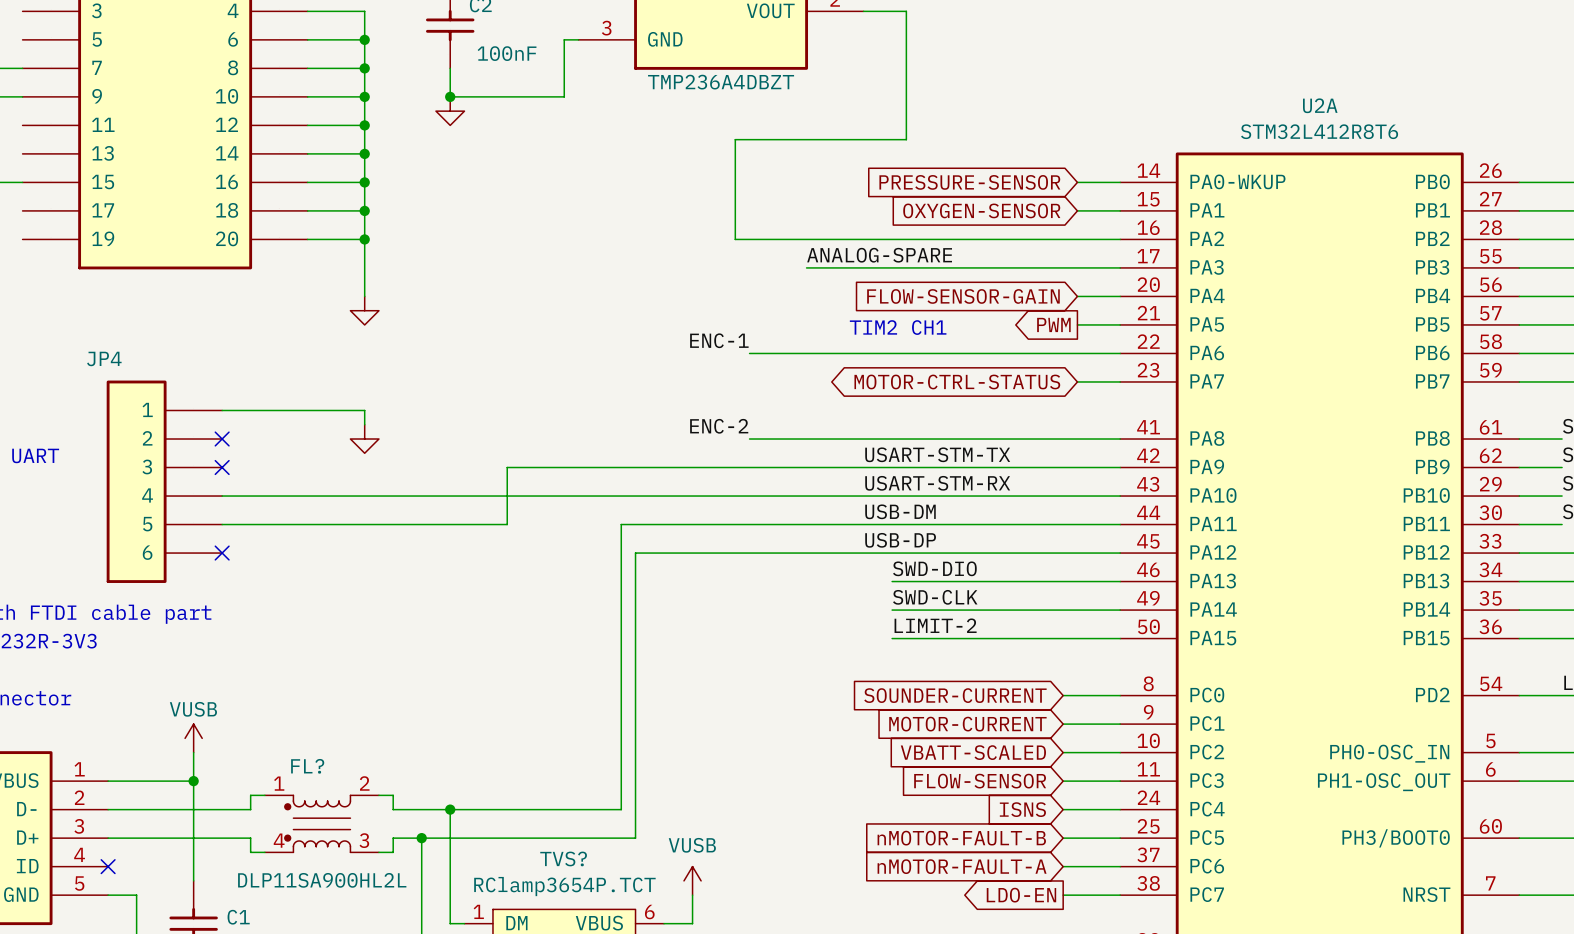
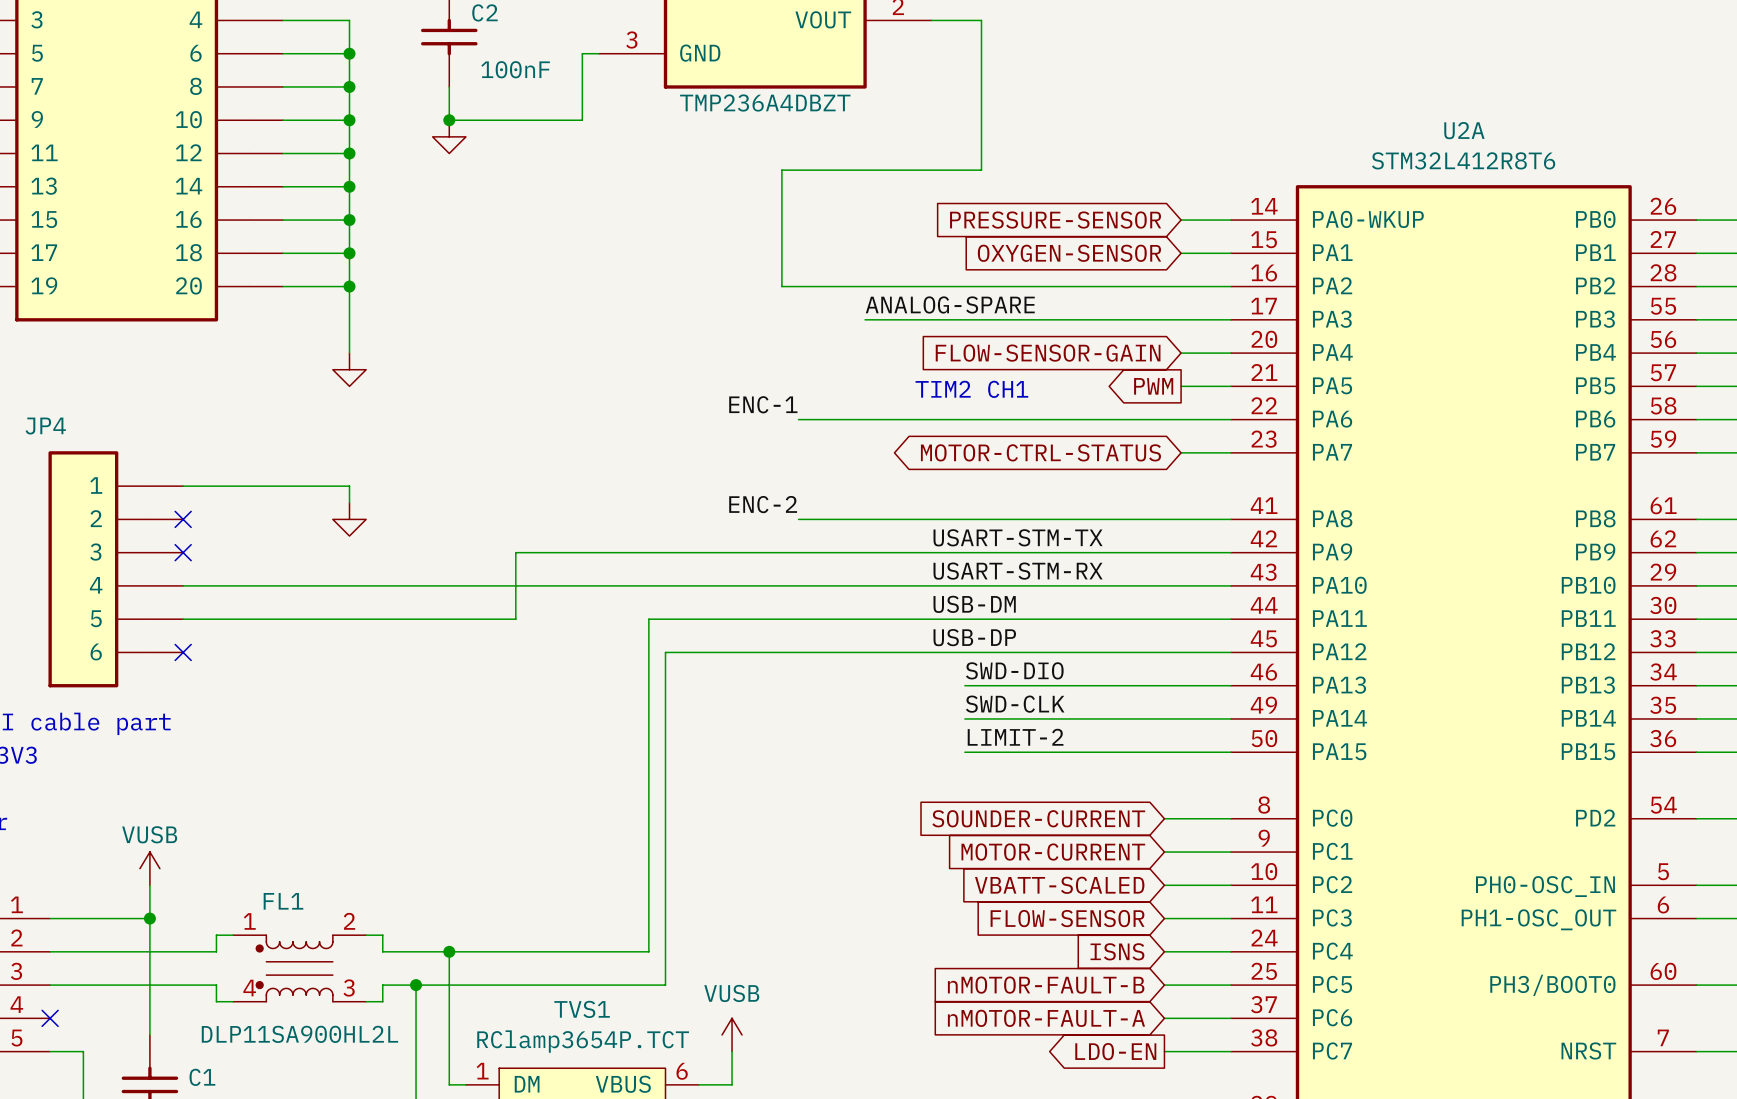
FL? name: FL? (307, 766) -> FL1 (283, 901)
TVS? name: TVS? (563, 858) -> TVS1 (582, 1009)

